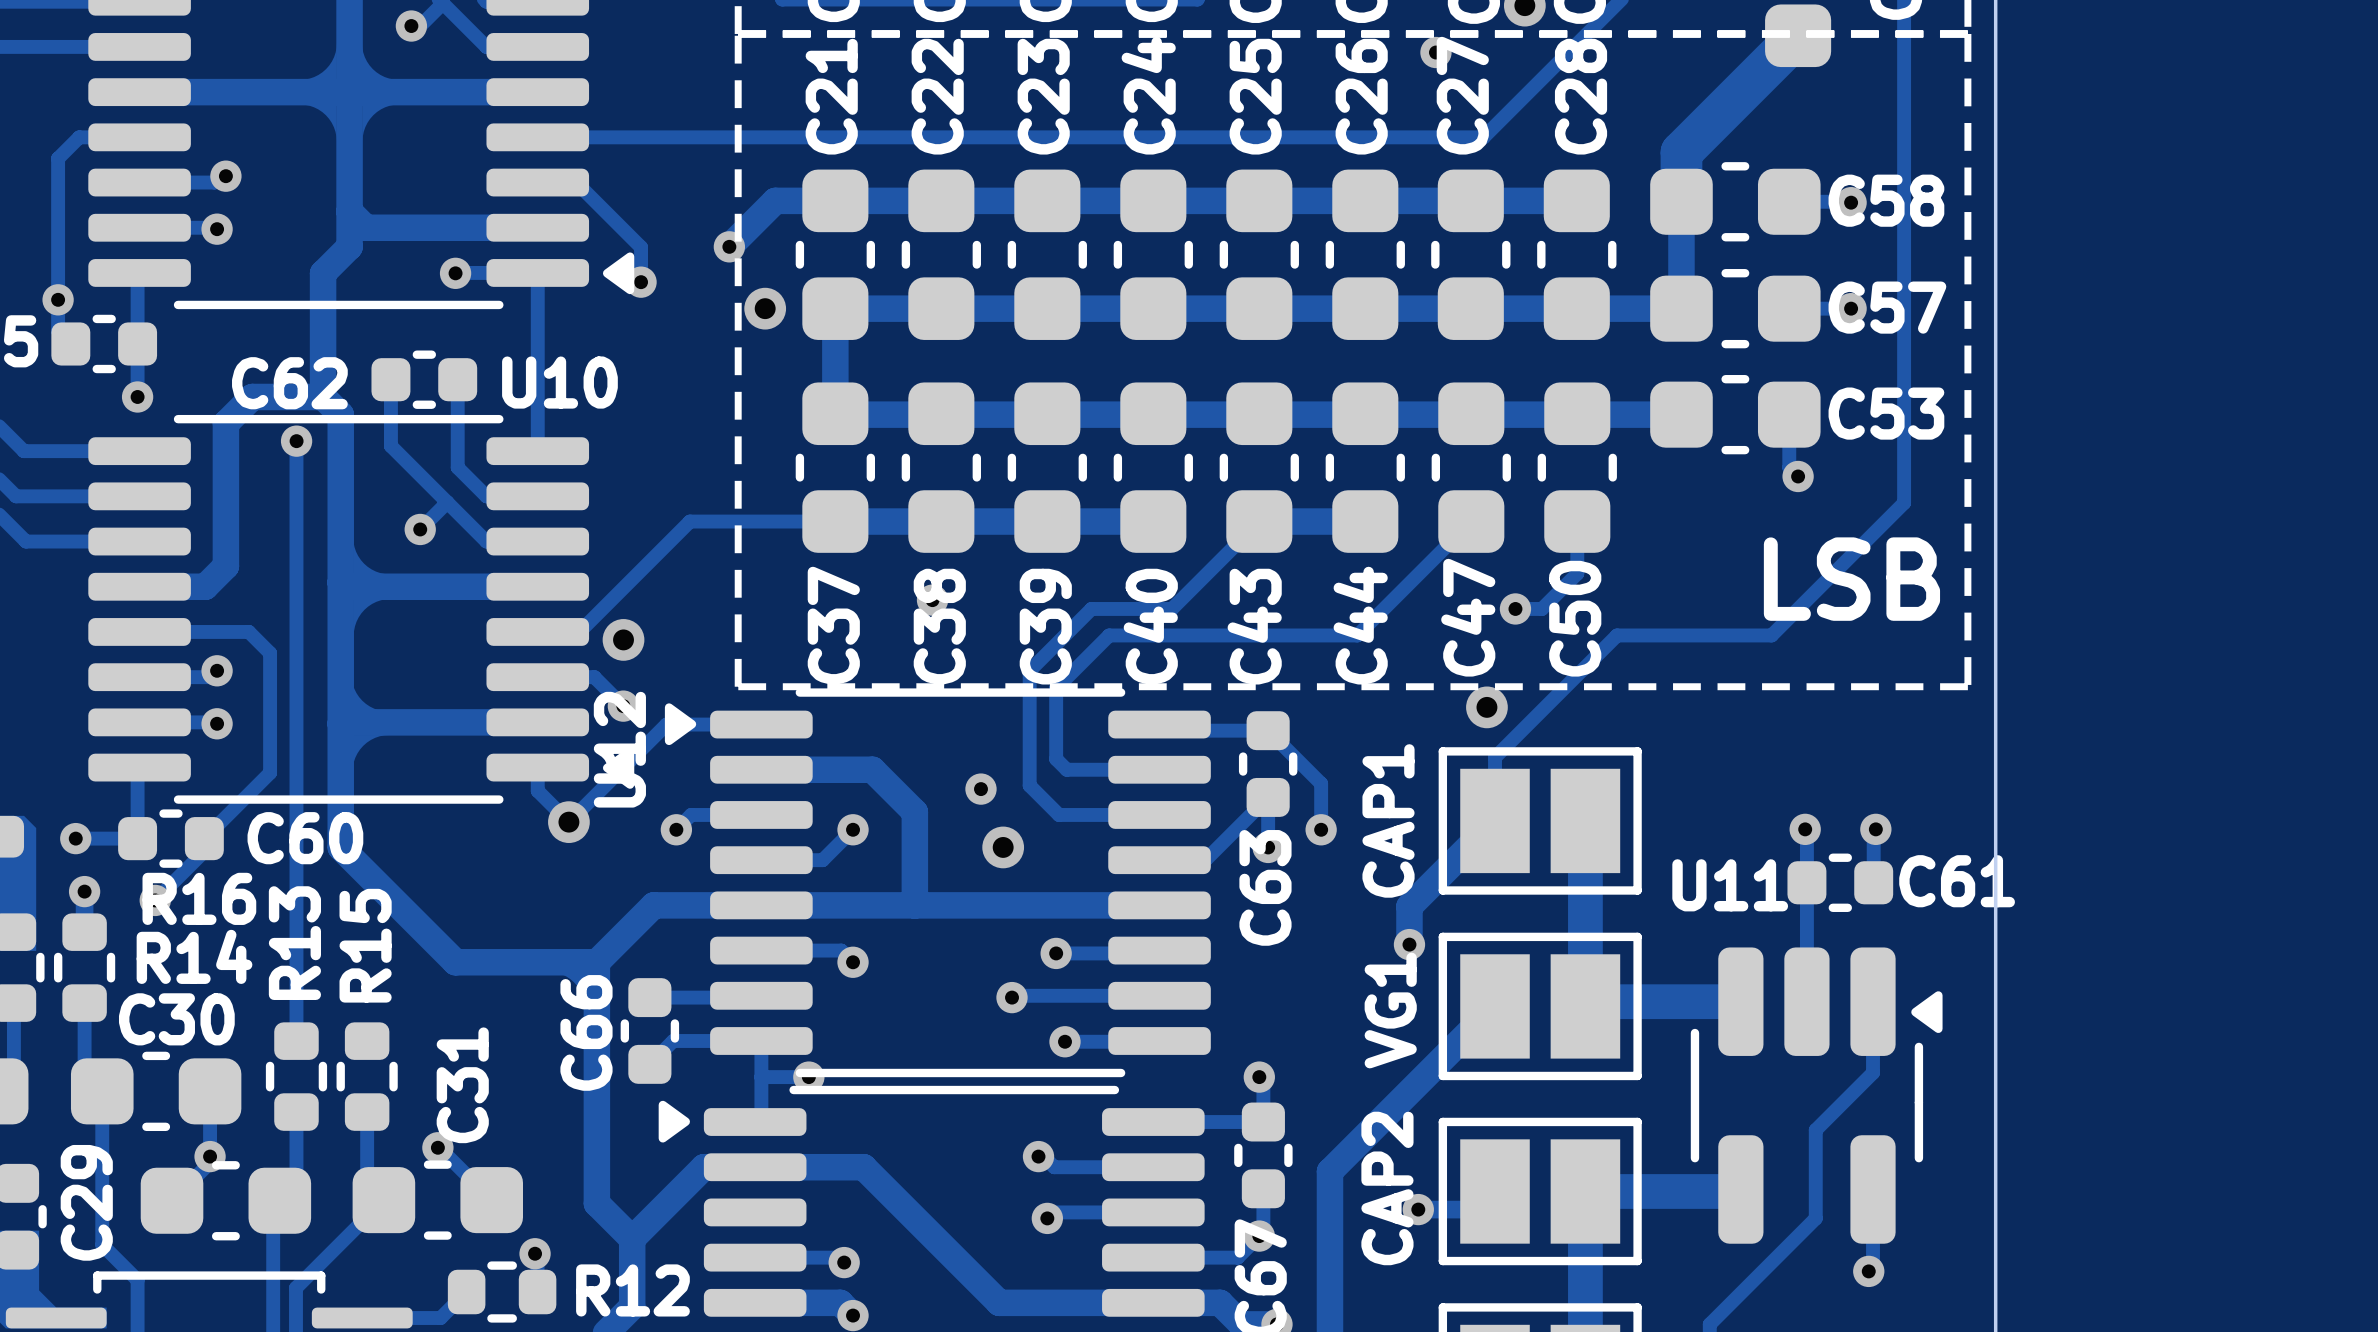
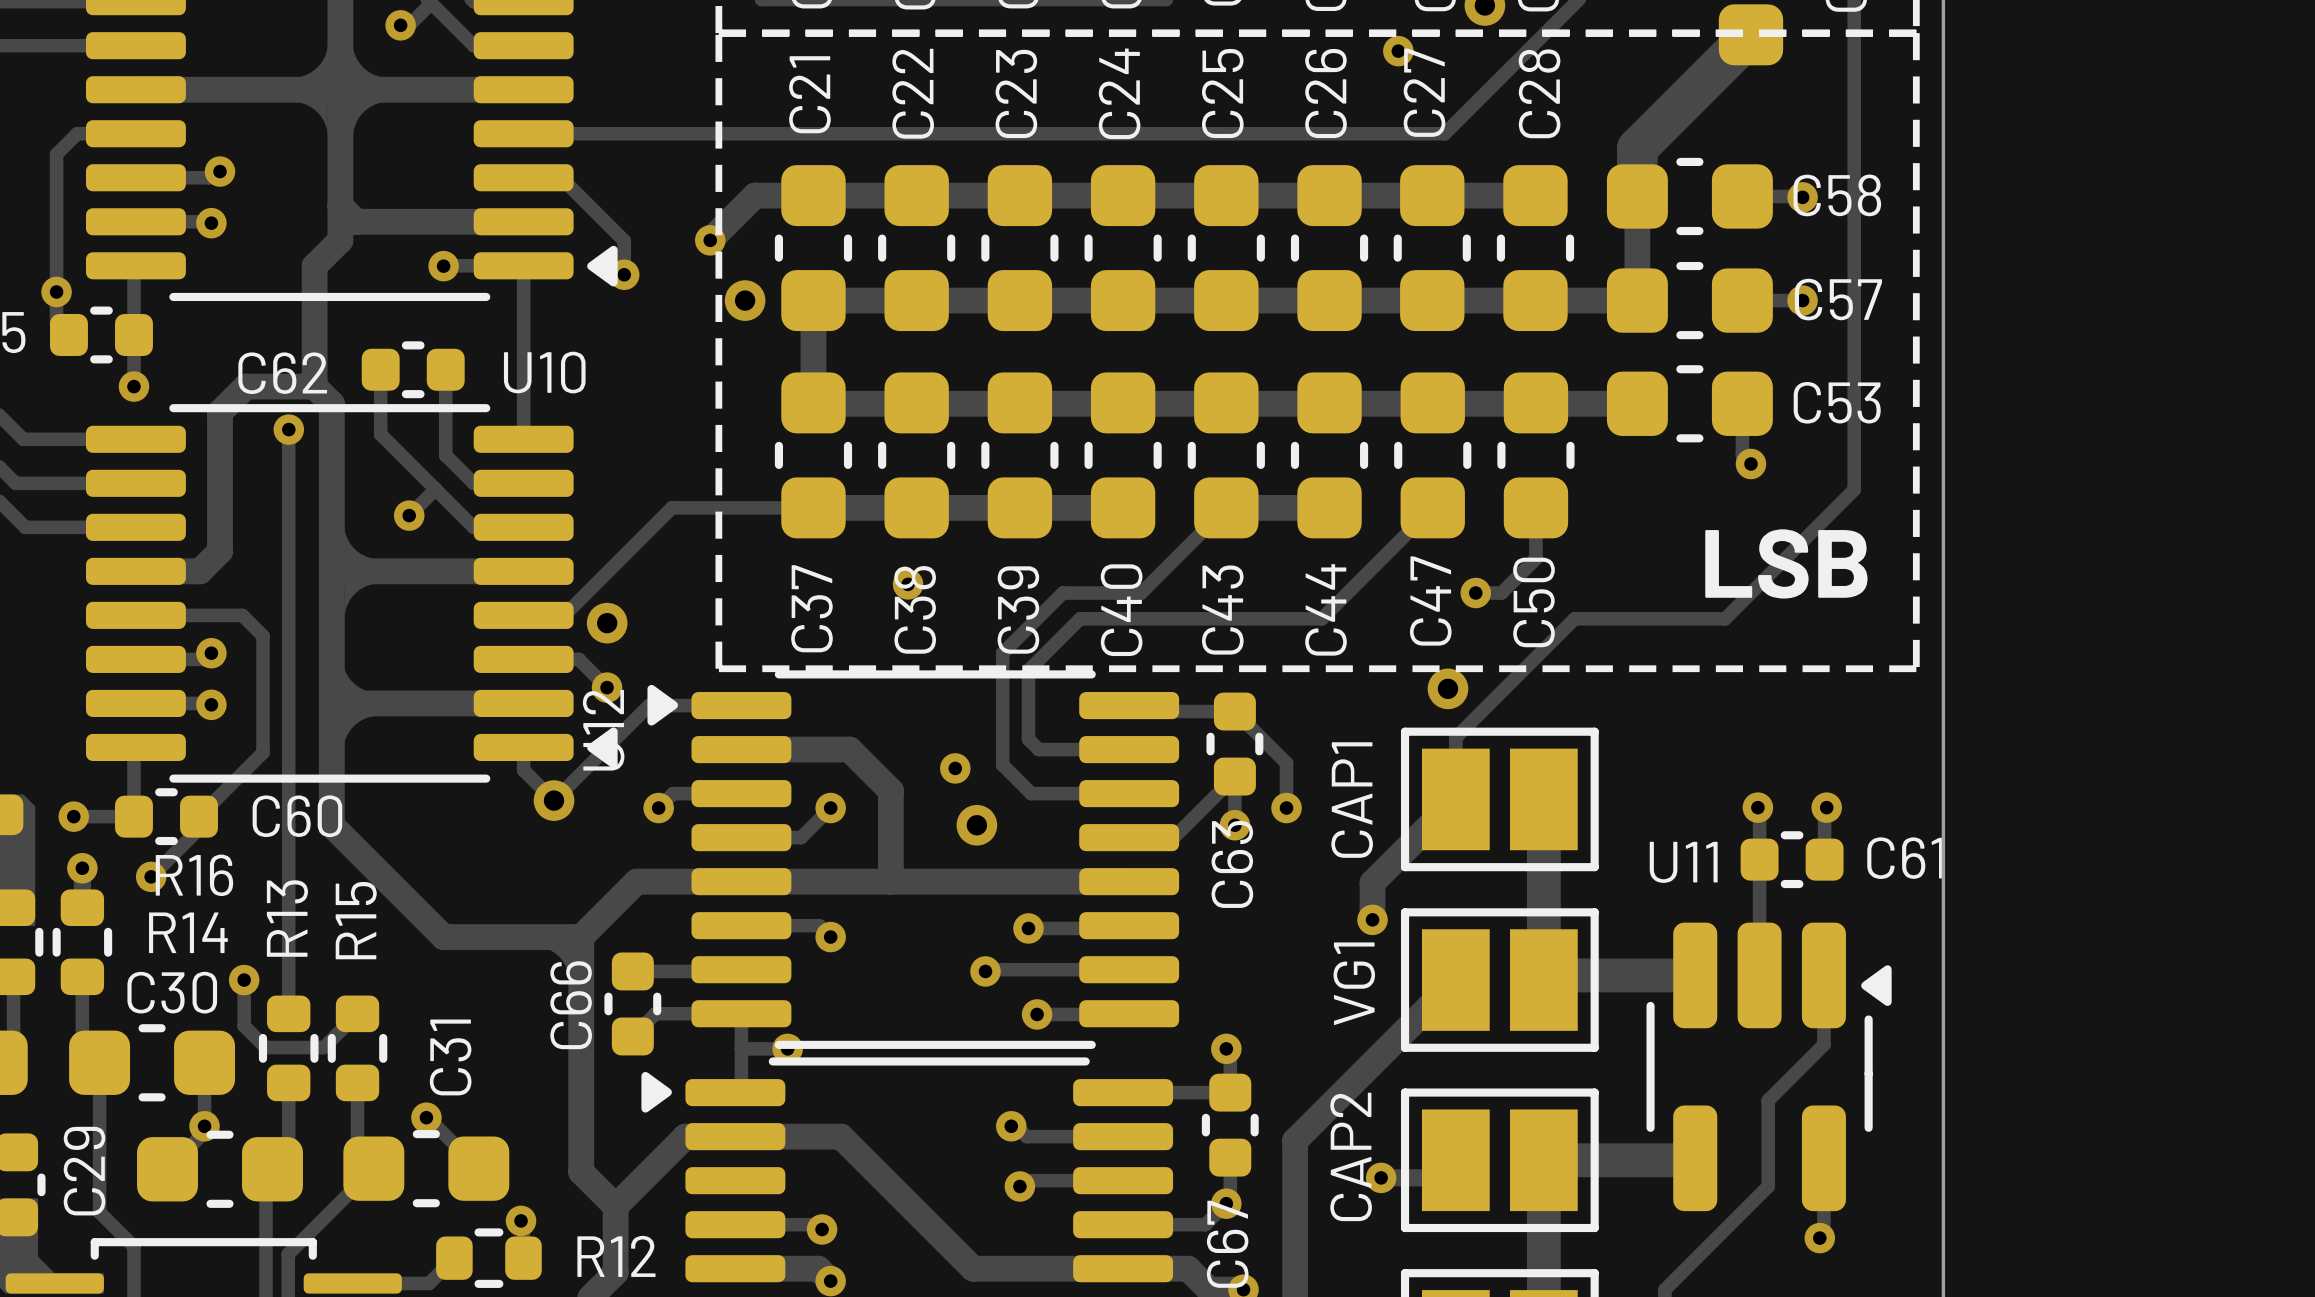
track: none -> (244, 980) (244, 1025) (265, 1047) (323, 1047) (357, 1013)
via: none -> (244, 980)

